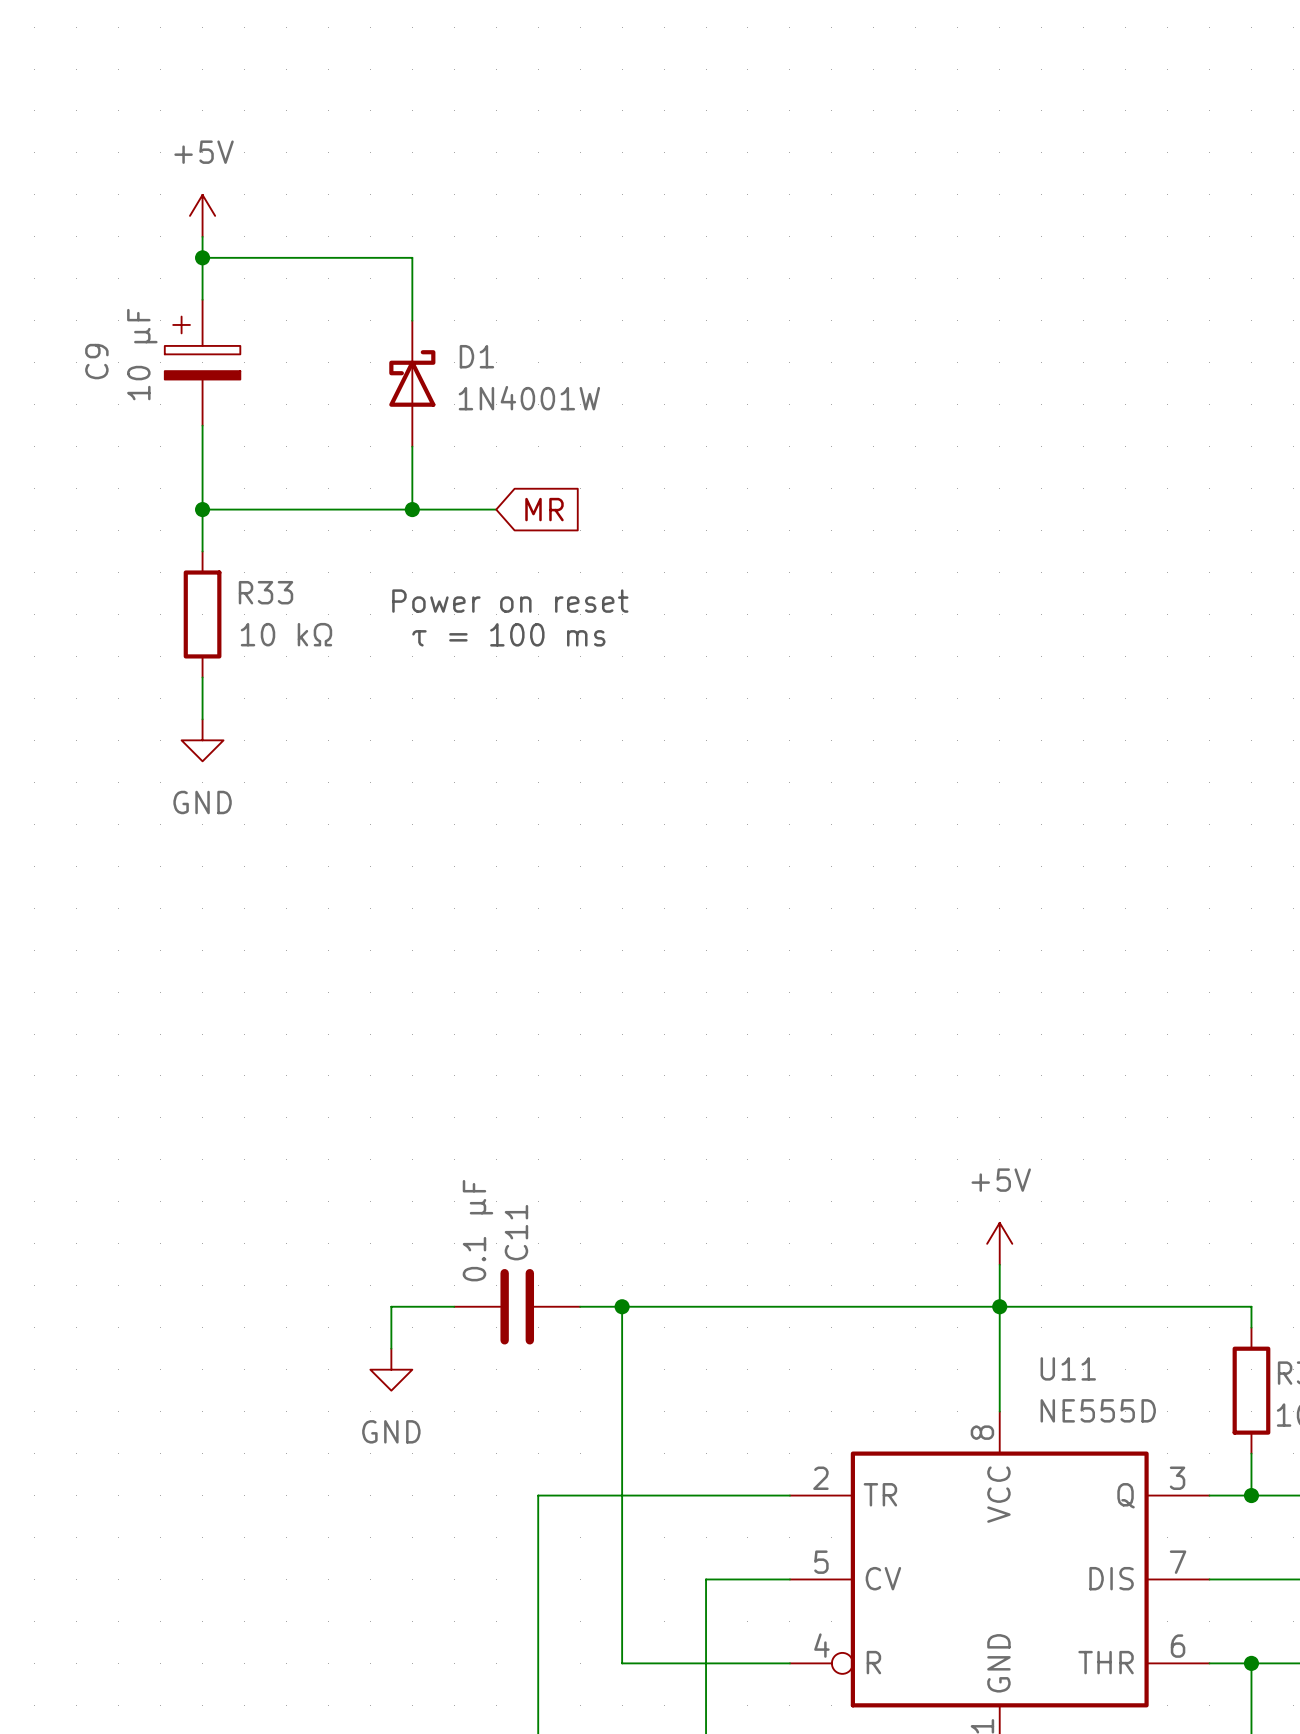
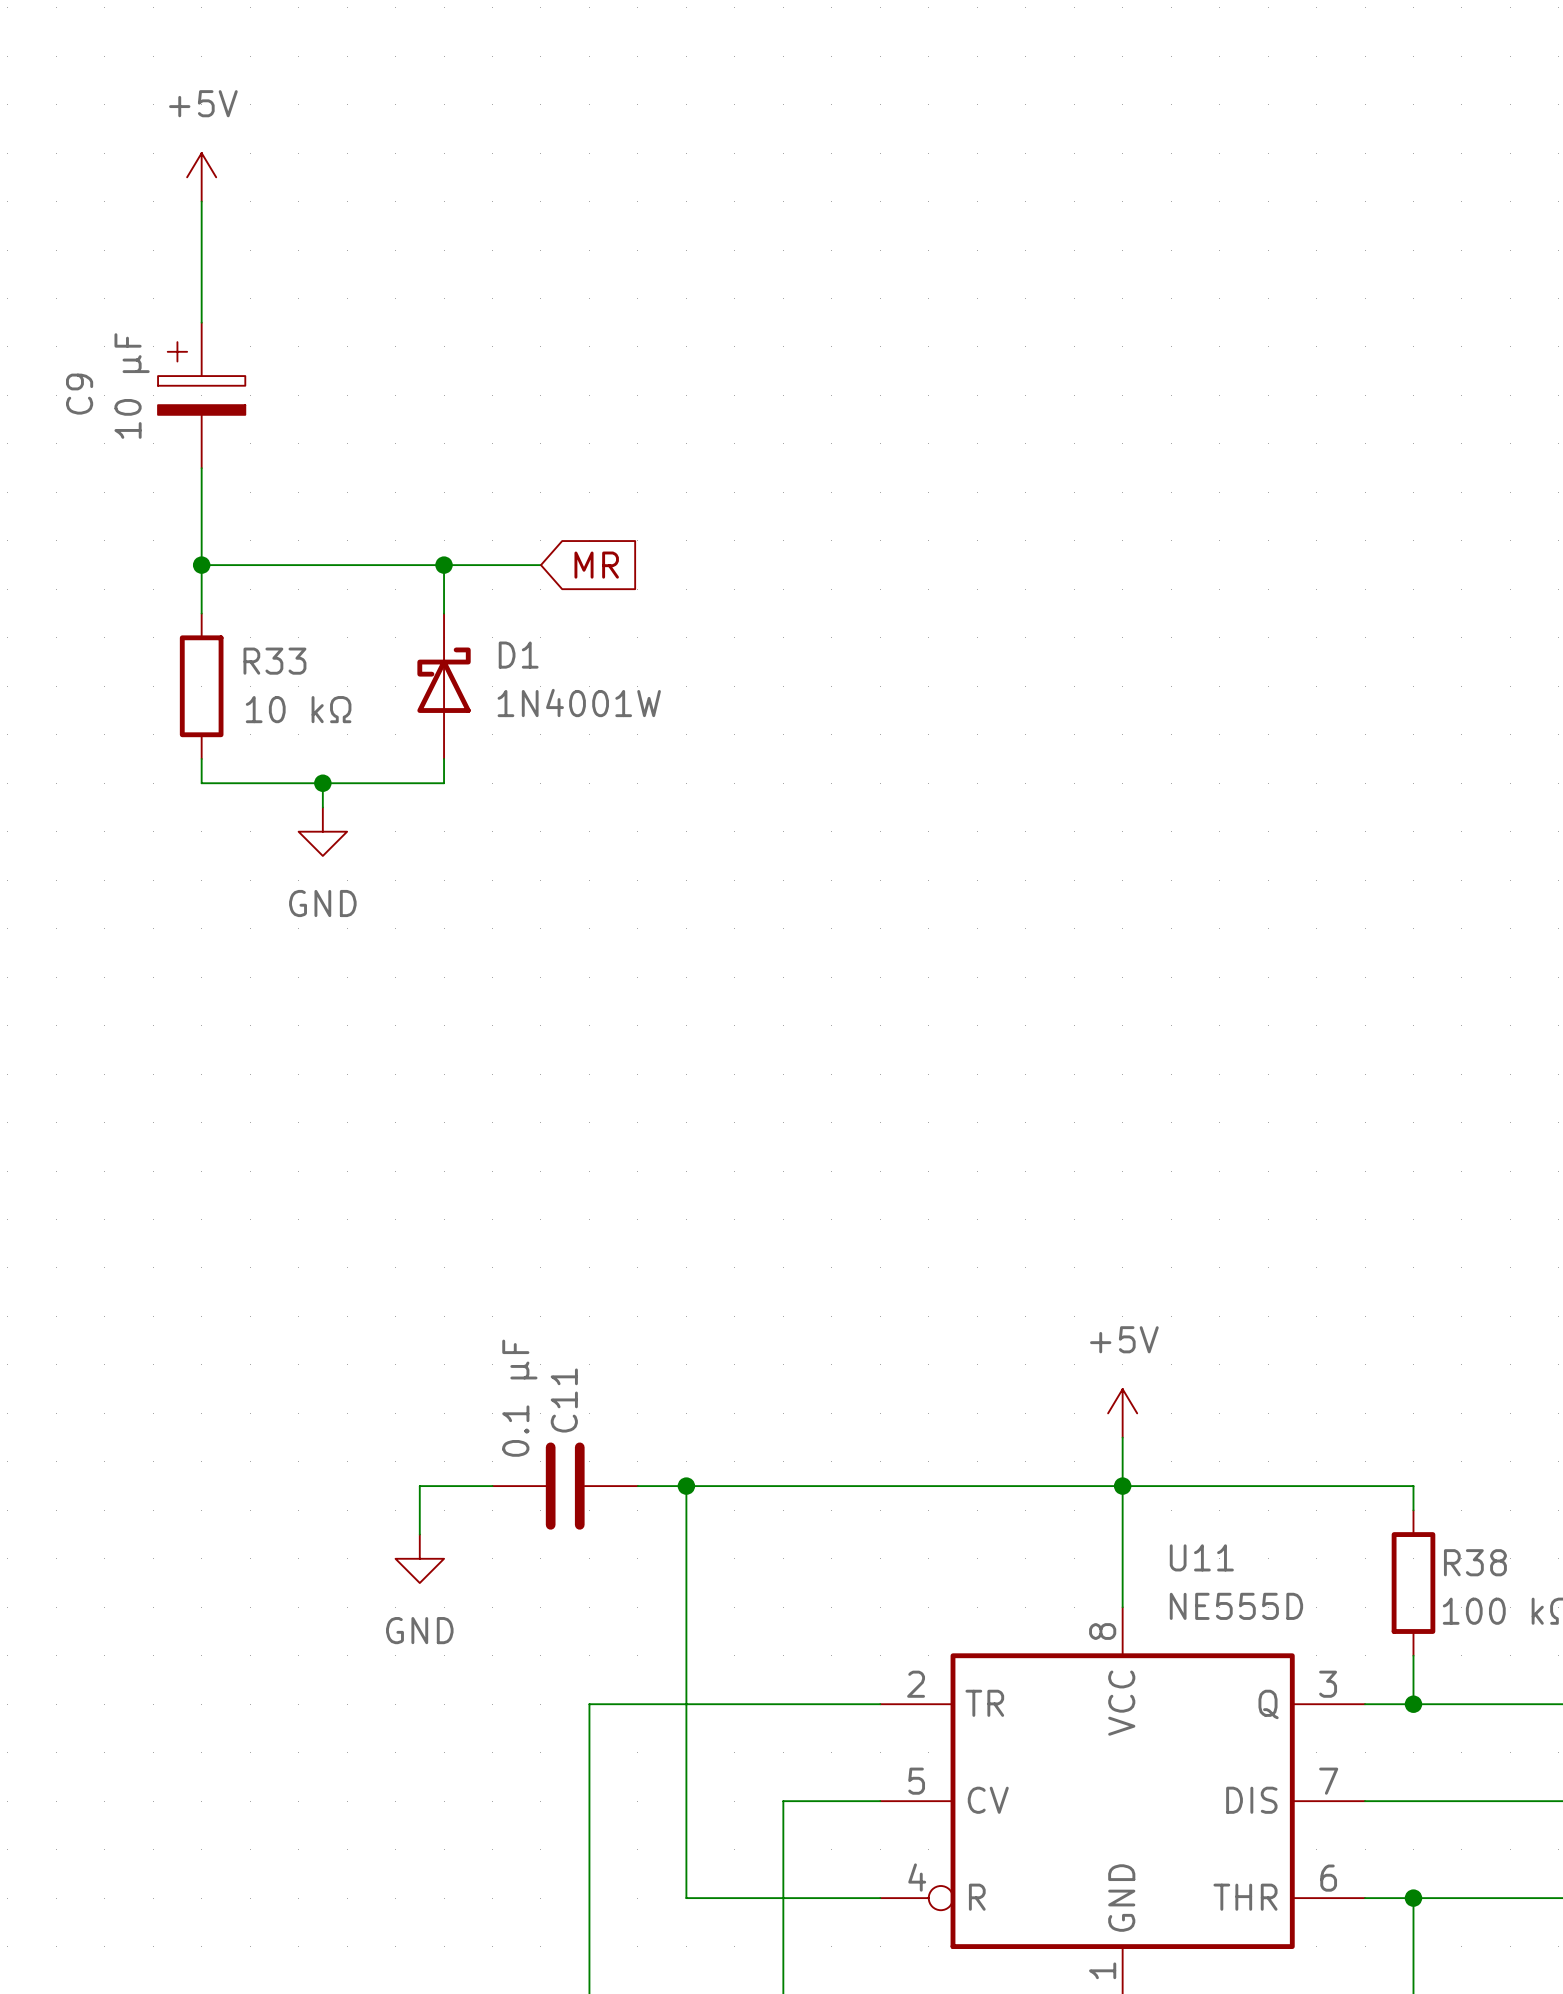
power symbol position: +5V (202, 215) -> +5V (201, 177)
wire: (202, 257) (412, 257) (412, 320) -> none
junction: (202, 257) -> none
D1 position: (412, 383) -> (444, 686)
wire: (412, 446) (412, 509) -> (444, 613) (444, 565)
text: Power on reset (510, 601) -> none
text: τ = 100 ms (508, 634) -> none
wire: (202, 698) (202, 719) -> (201, 783) (444, 783) (444, 758)
wire: none -> (322, 783) (322, 807)
junction: none -> (322, 783)
power symbol position: GND (202, 740) -> GND (322, 831)

